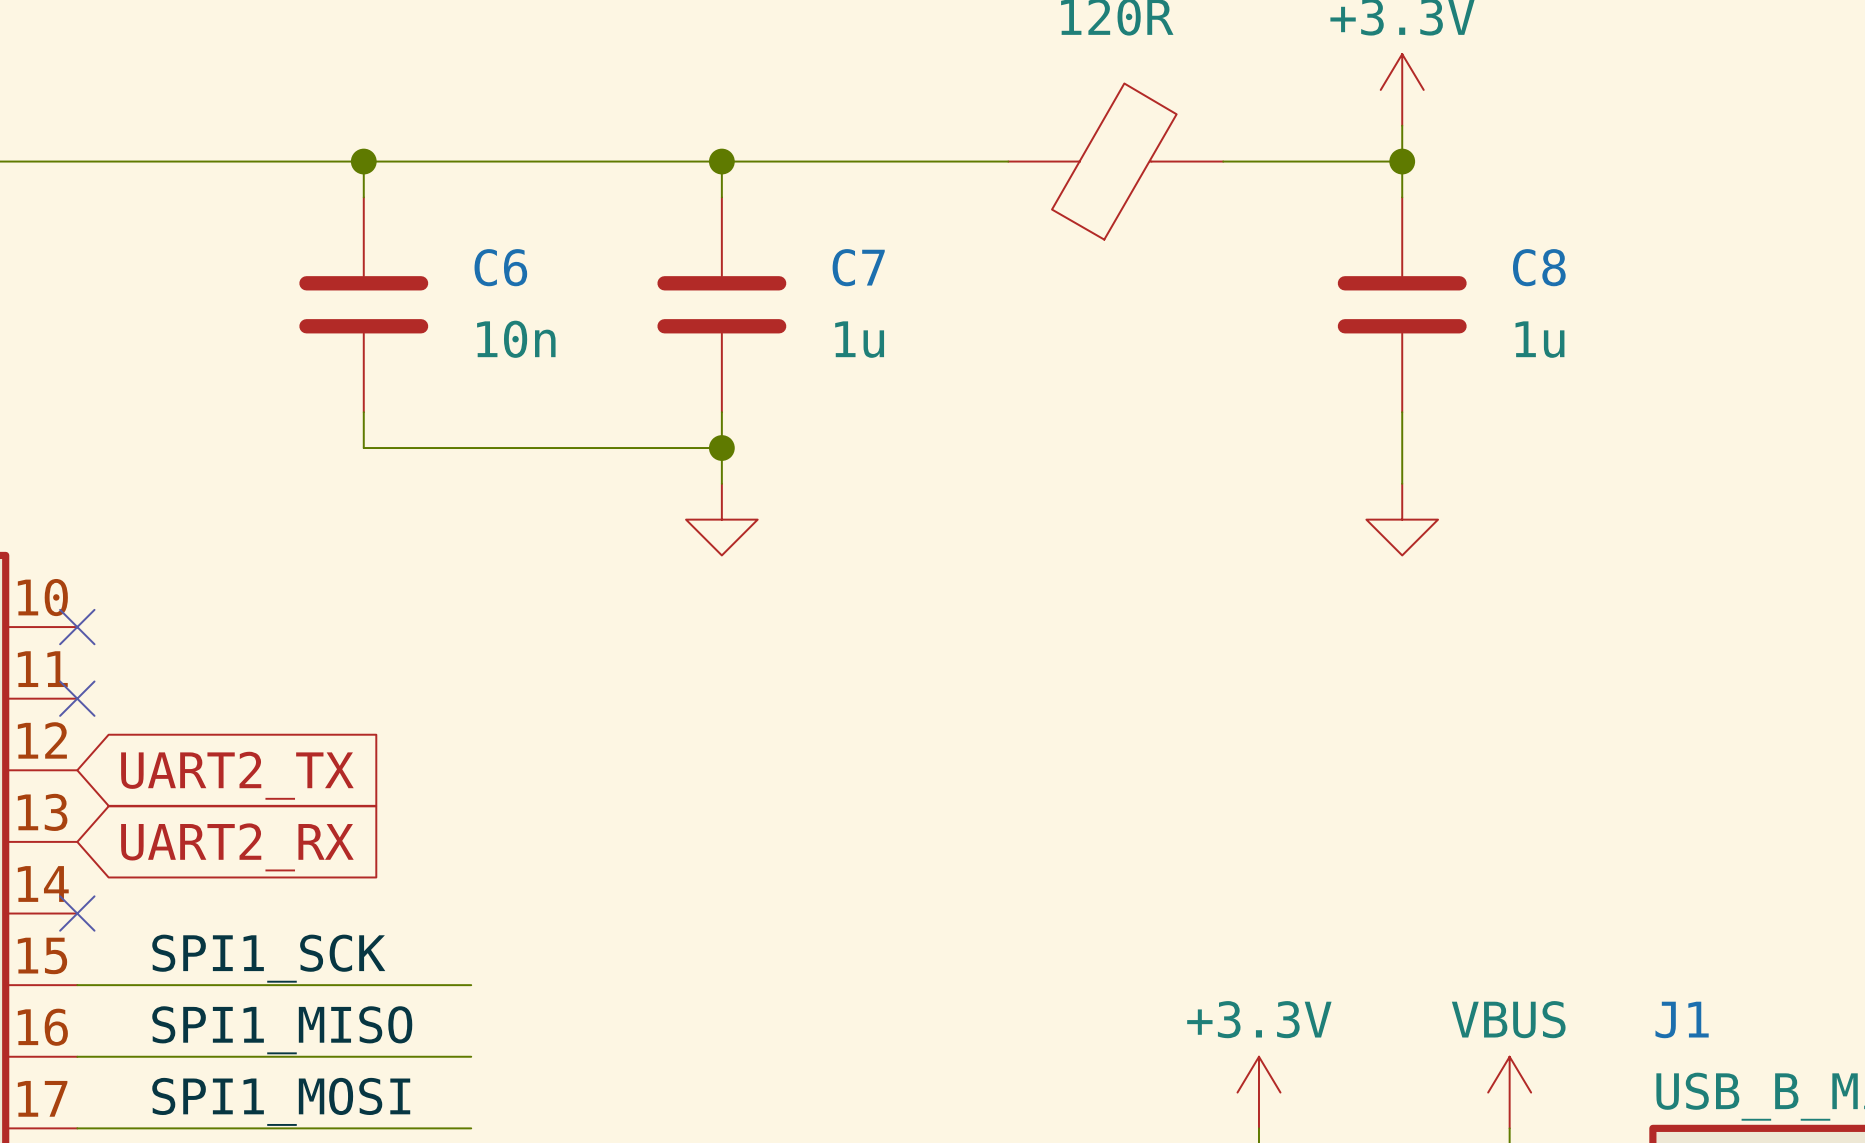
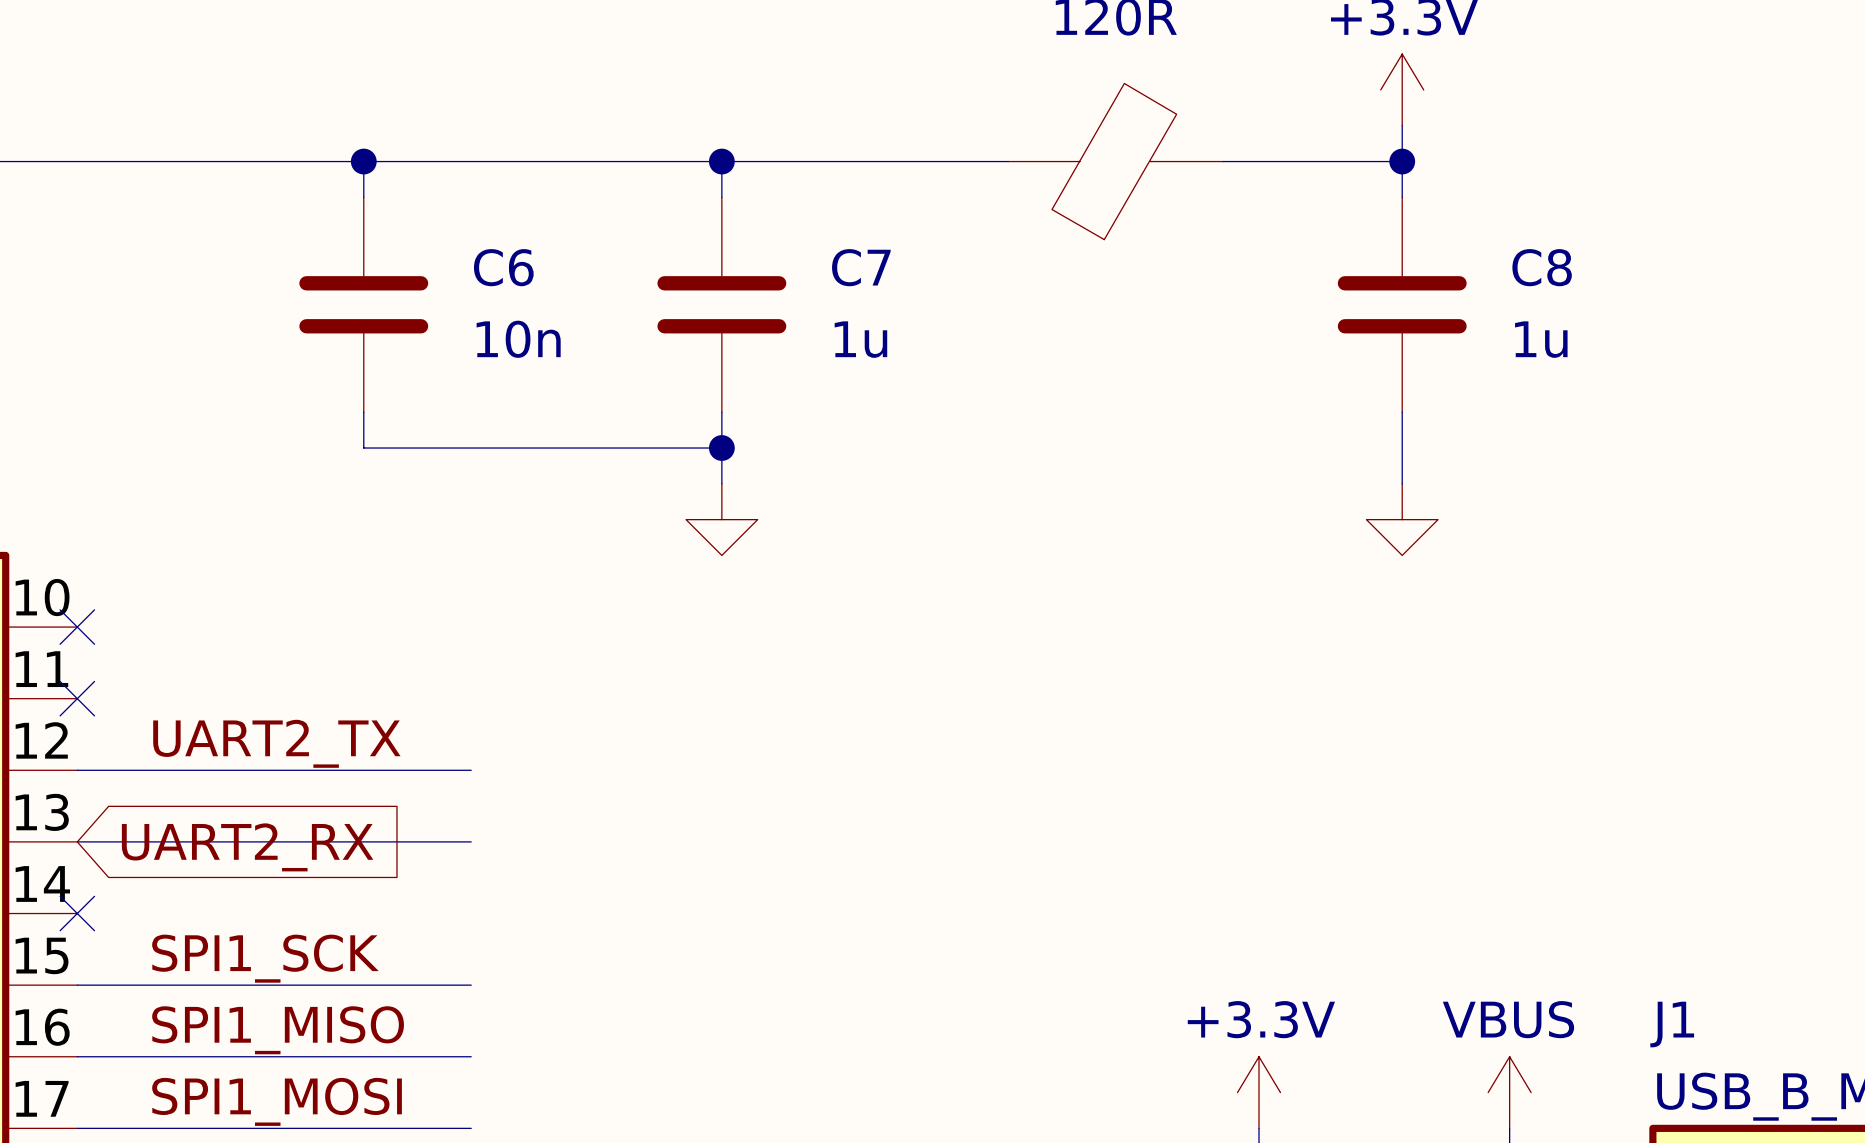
label: none -> UART2_TX (276, 743)
wire: none -> (77, 770) (471, 770)
global label: UART2_TX (237, 775) -> none
wire: none -> (77, 841) (471, 841)

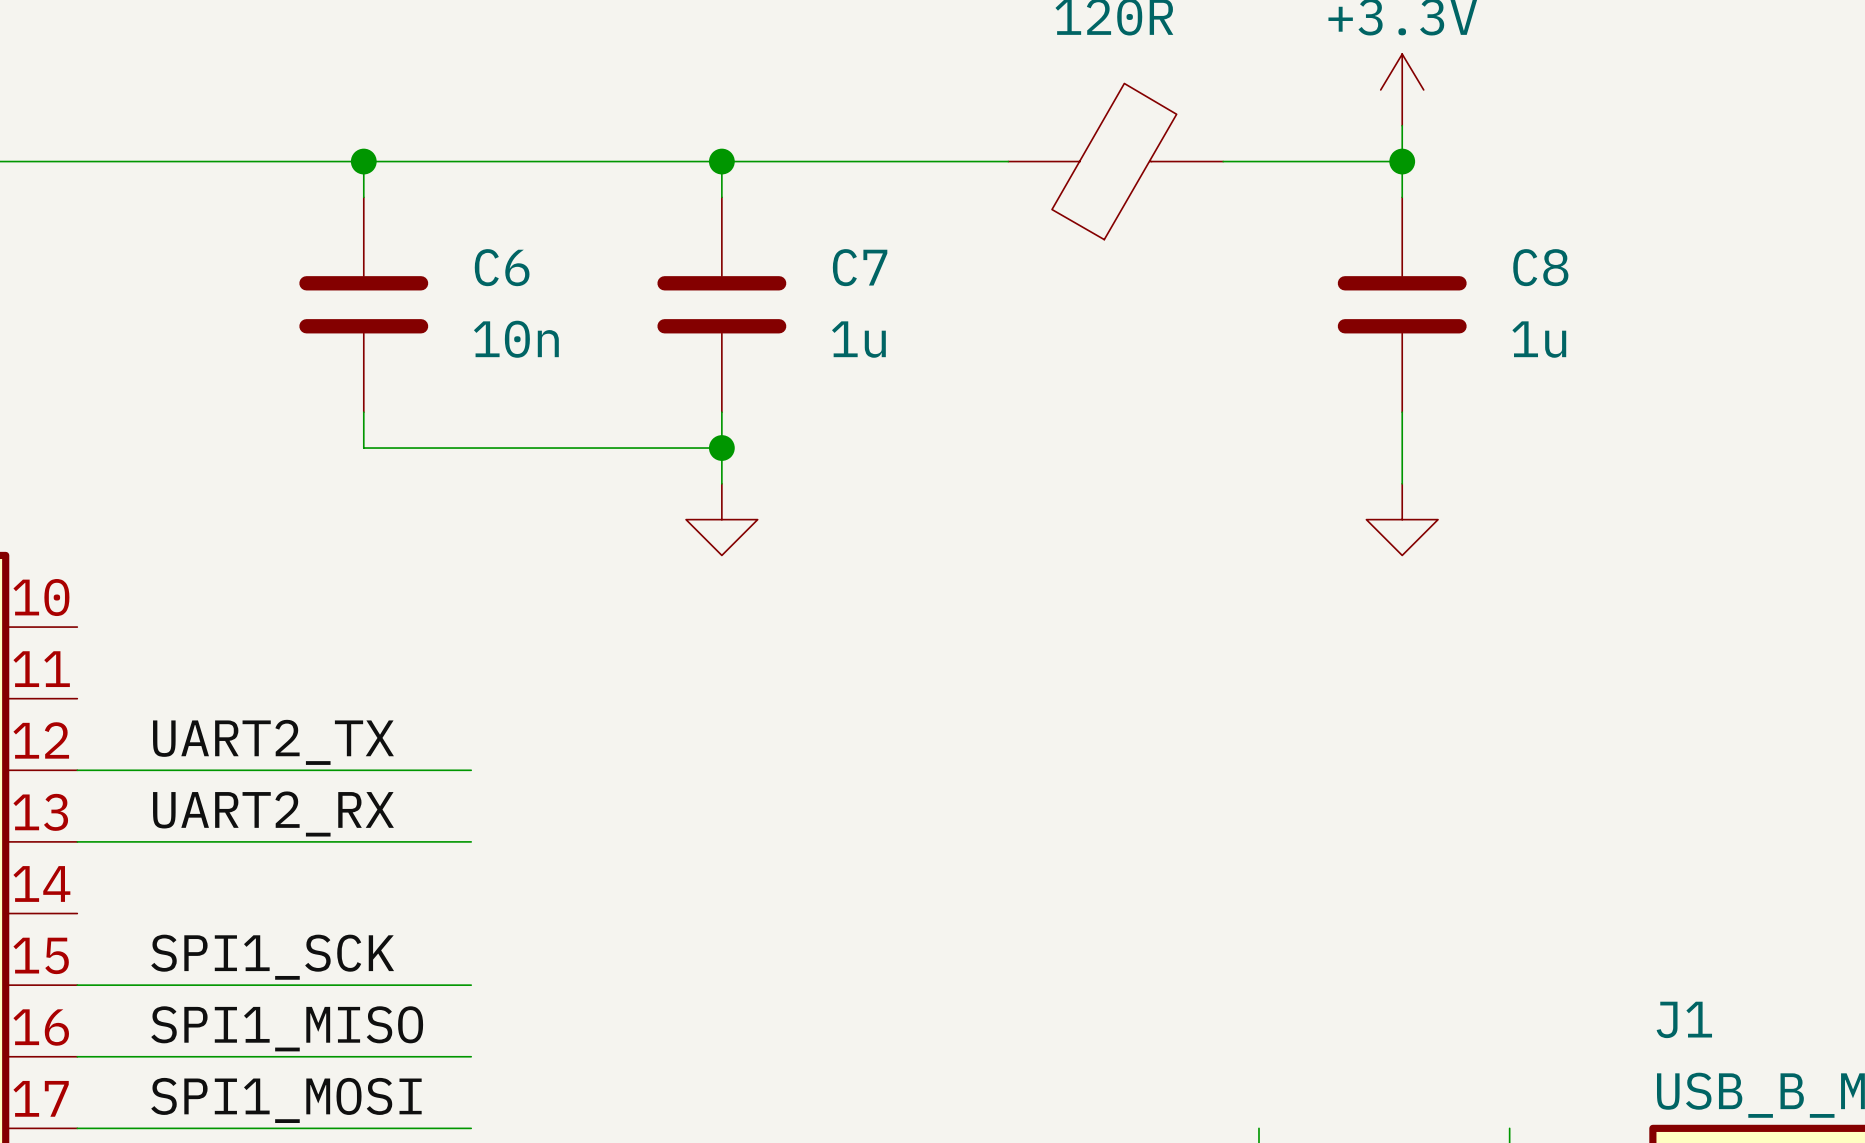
no-connect mark: (77, 627) -> none
no-connect mark: (77, 698) -> none
label: none -> UART2_RX (273, 813)
global label: UART2_RX (247, 847) -> none
no-connect mark: (77, 913) -> none
power symbol: +3.3V (1258, 1092) -> none
power symbol: VBUS (1509, 1092) -> none

